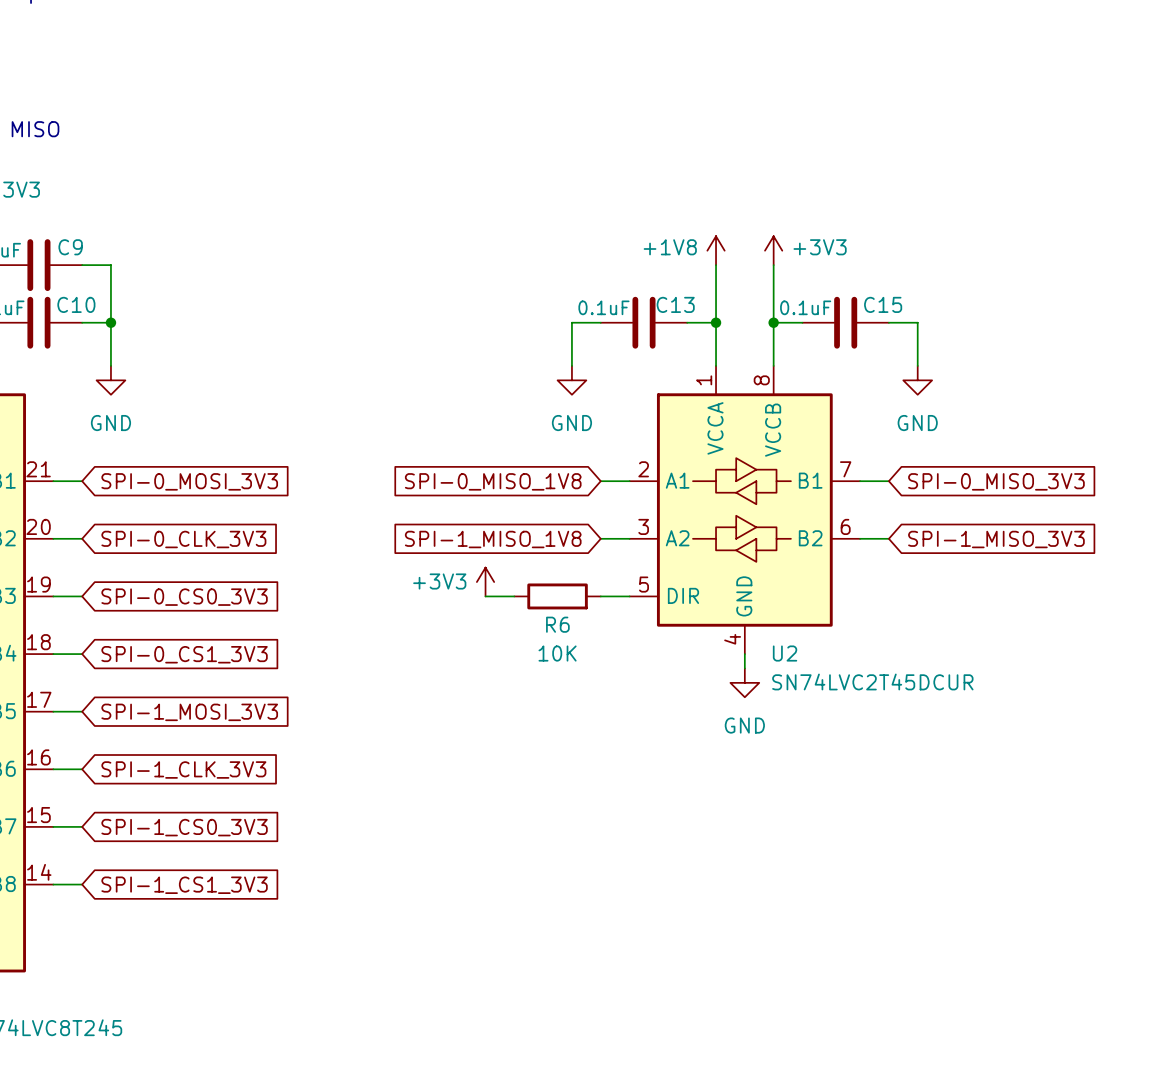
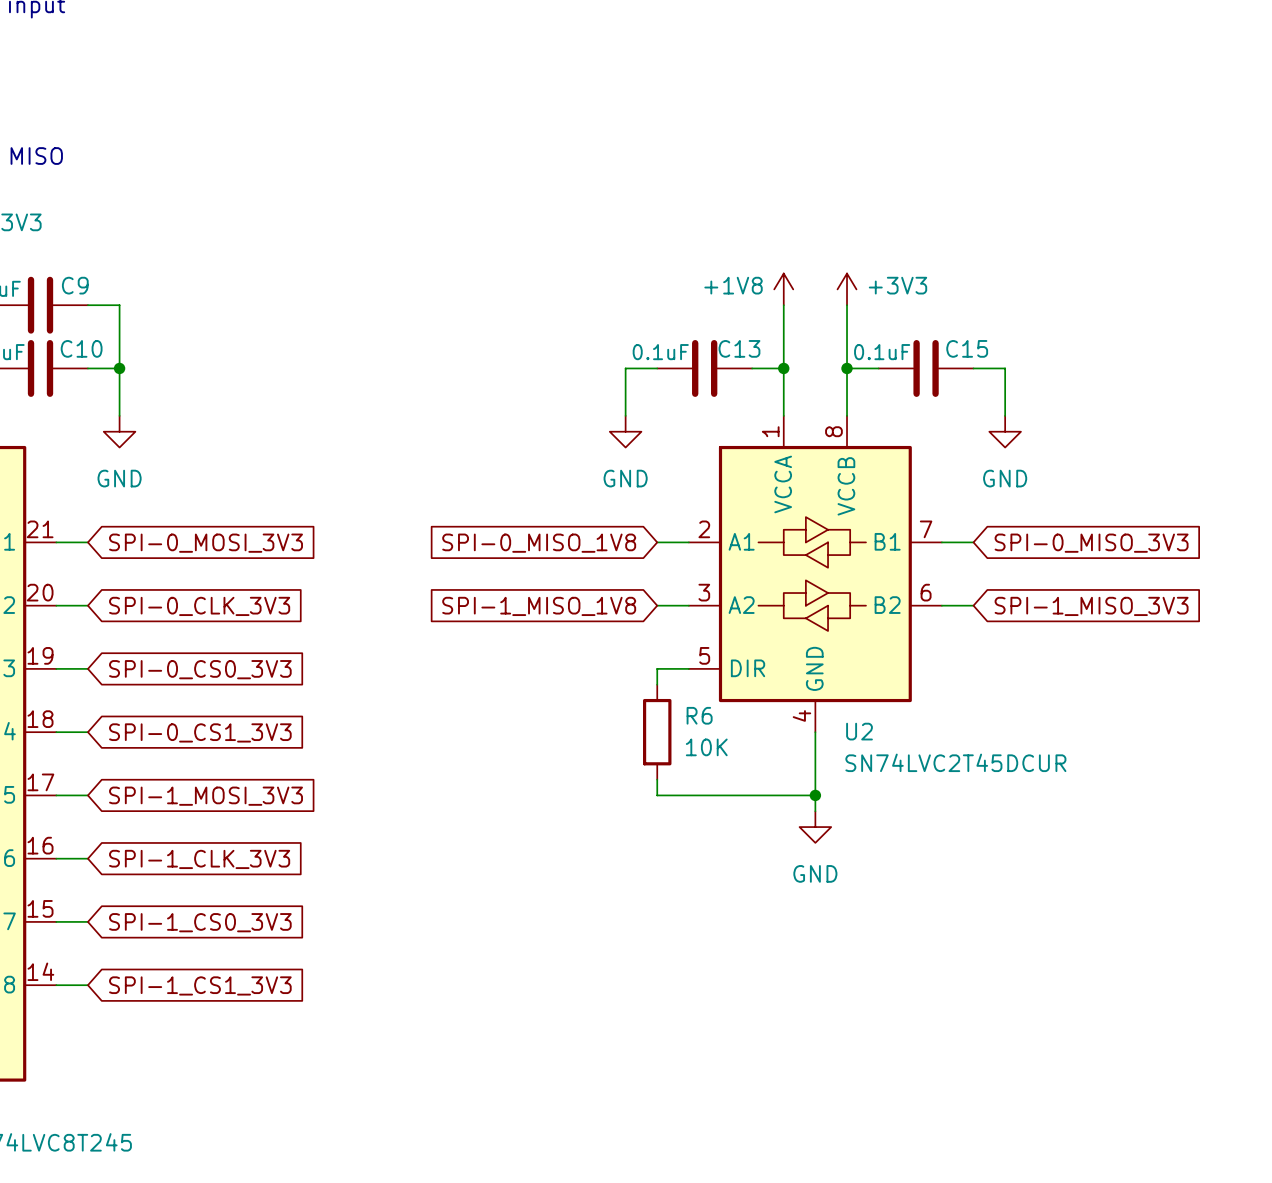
power symbol: +3V3 (485, 582) -> none
wire: (485, 596) (514, 596) -> none
R6 rotation: 0° (557, 596) -> 90° clockwise (657, 732)
R6 position: (557, 596) -> (657, 732)
wire: none -> (657, 668) (657, 684)
R6 name position: R6 (557, 624) -> R6 (699, 715)
R6 value position: 10K (557, 653) -> 10K (706, 747)
wire: none -> (815, 747) (815, 811)
power symbol position: GND (744, 682) -> GND (815, 827)
wire: none -> (657, 779) (657, 795) (815, 795)
junction: none -> (815, 795)

